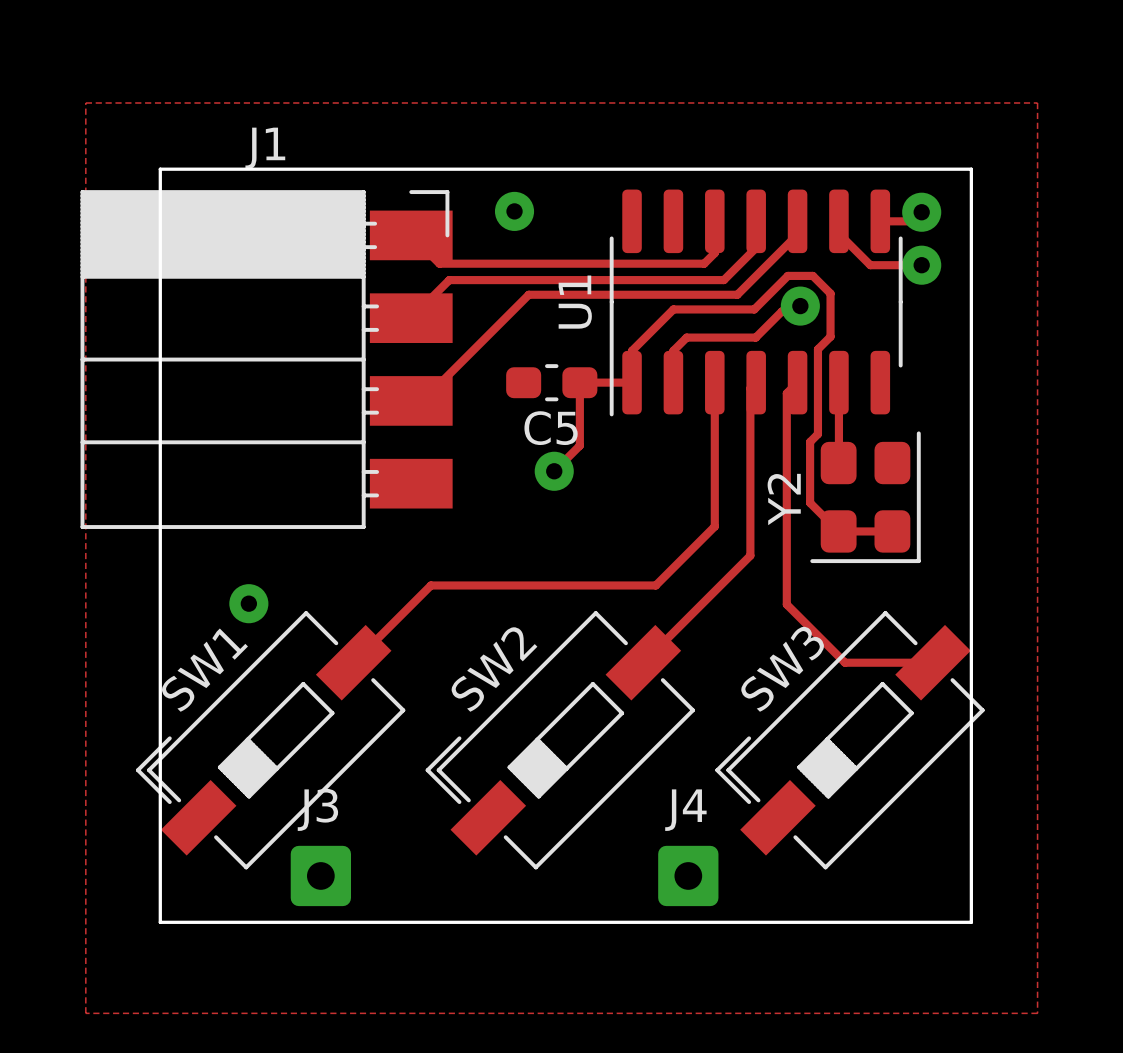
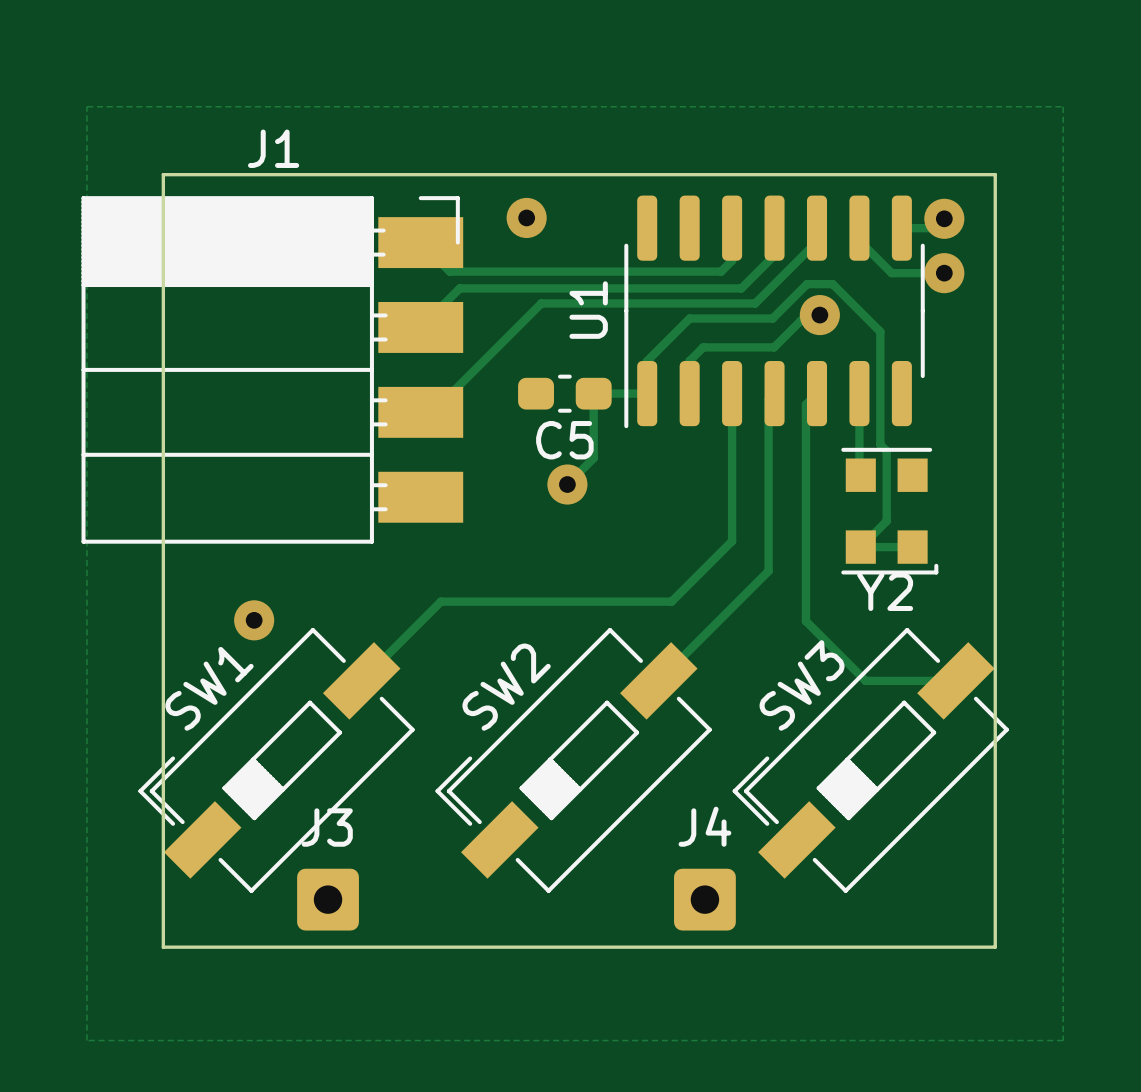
track: (830, 293) (830, 336) (817, 349) (817, 434) (810, 442) (810, 502) (838, 531) (892, 531) -> (850, 302) (880, 331) (880, 444) (886, 450) (886, 521) (860, 547) (912, 547)
Y2 footprint: [810, 431, 921, 564] -> [841, 447, 939, 575]
Y2 name position: Y2 (784, 499) -> Y2 (885, 591)

